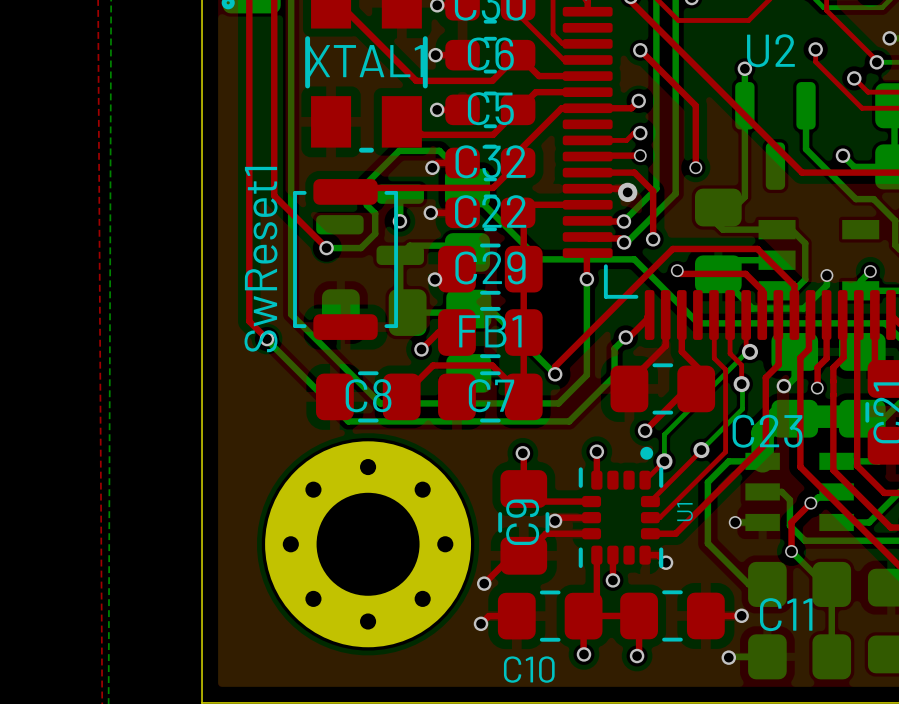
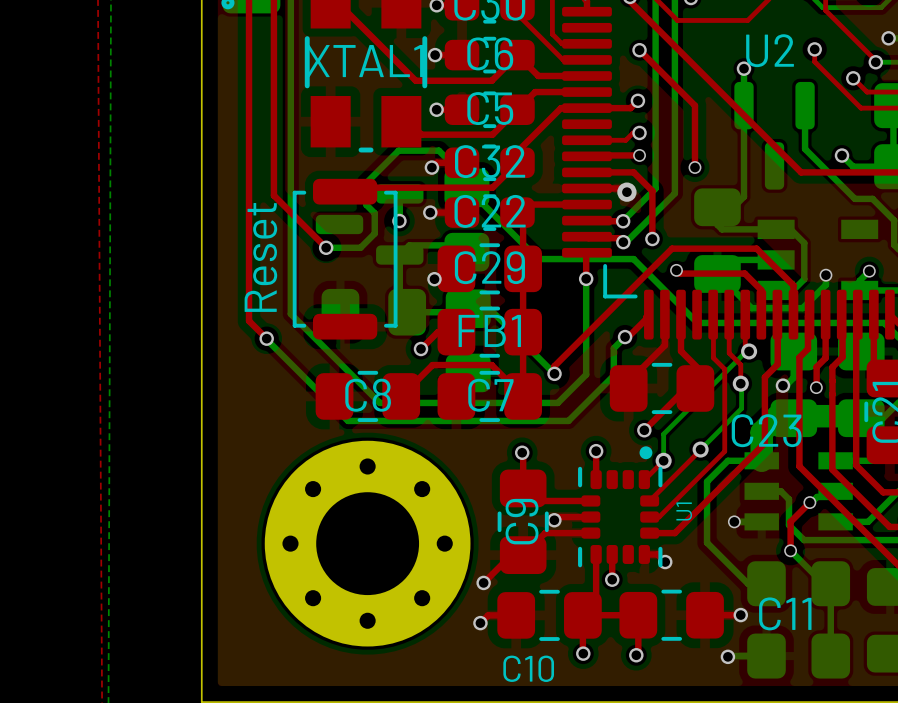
SwReset1 name: SwReset1 (261, 259) -> Reset (260, 257)

